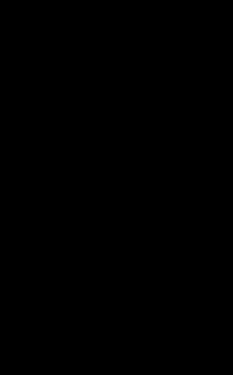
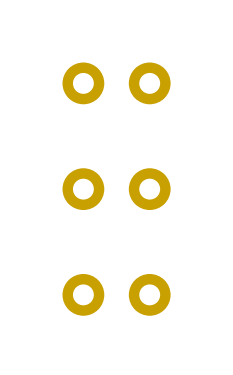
part: none -> (116, 83)
part: none -> (116, 189)
part: none -> (116, 294)

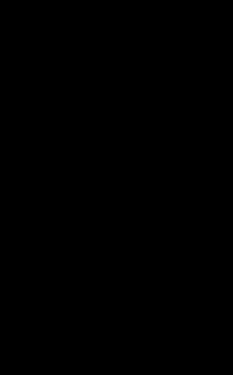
part: (116, 83) -> none
part: (116, 189) -> none
part: (116, 294) -> none

